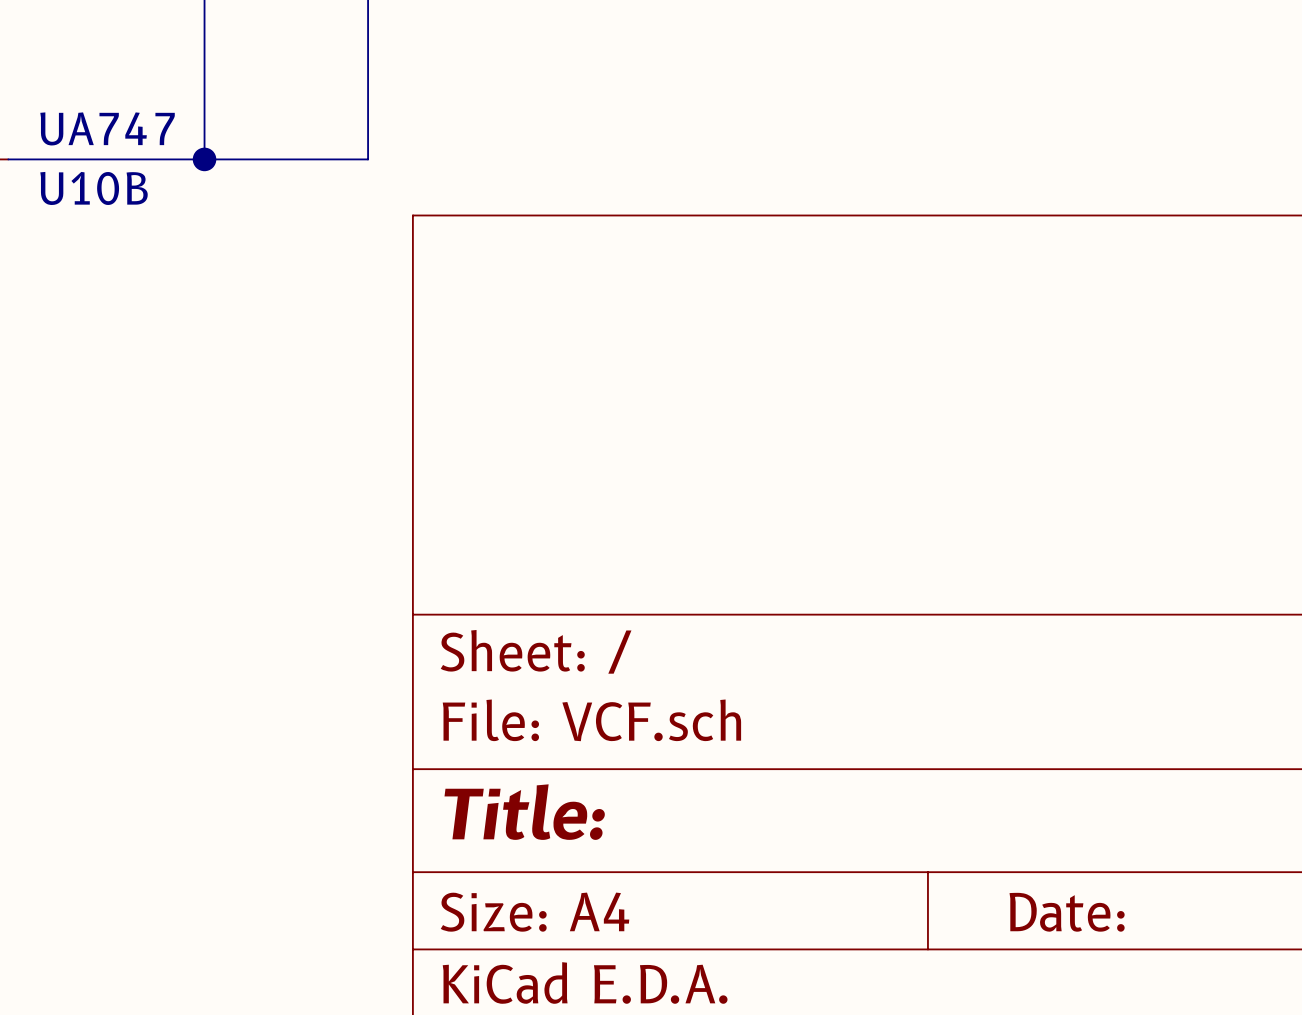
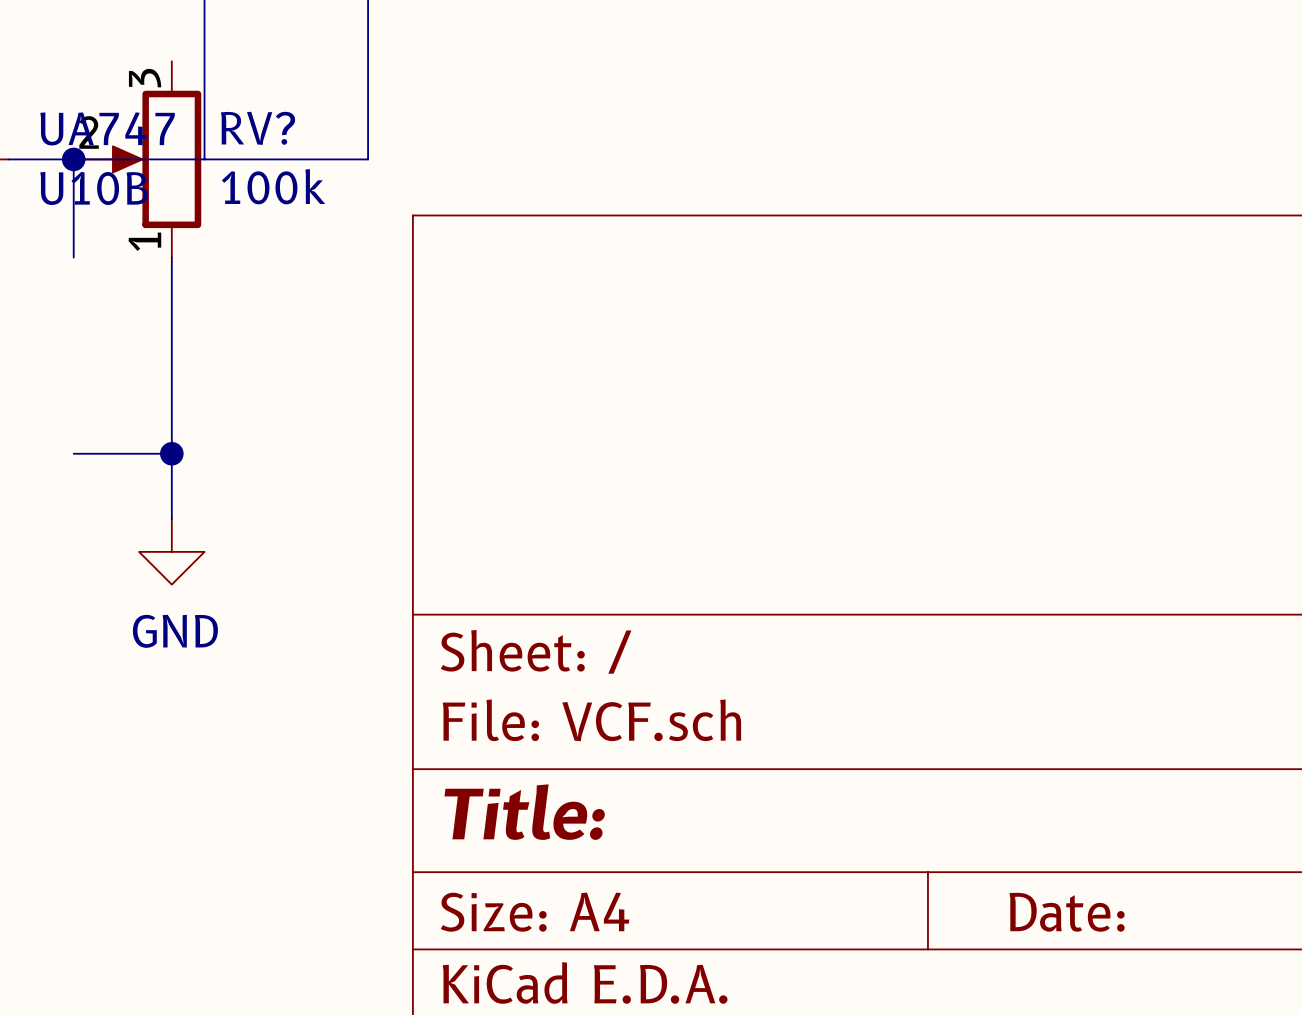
wire: none -> (73, 159) (73, 257)
RV?: none -> 100k (137, 159)
junction position: (204, 159) -> (73, 159)
wire: none -> (171, 257) (171, 519)
wire: none -> (73, 453) (171, 453)
junction: none -> (171, 453)
power symbol: none -> GND (171, 551)

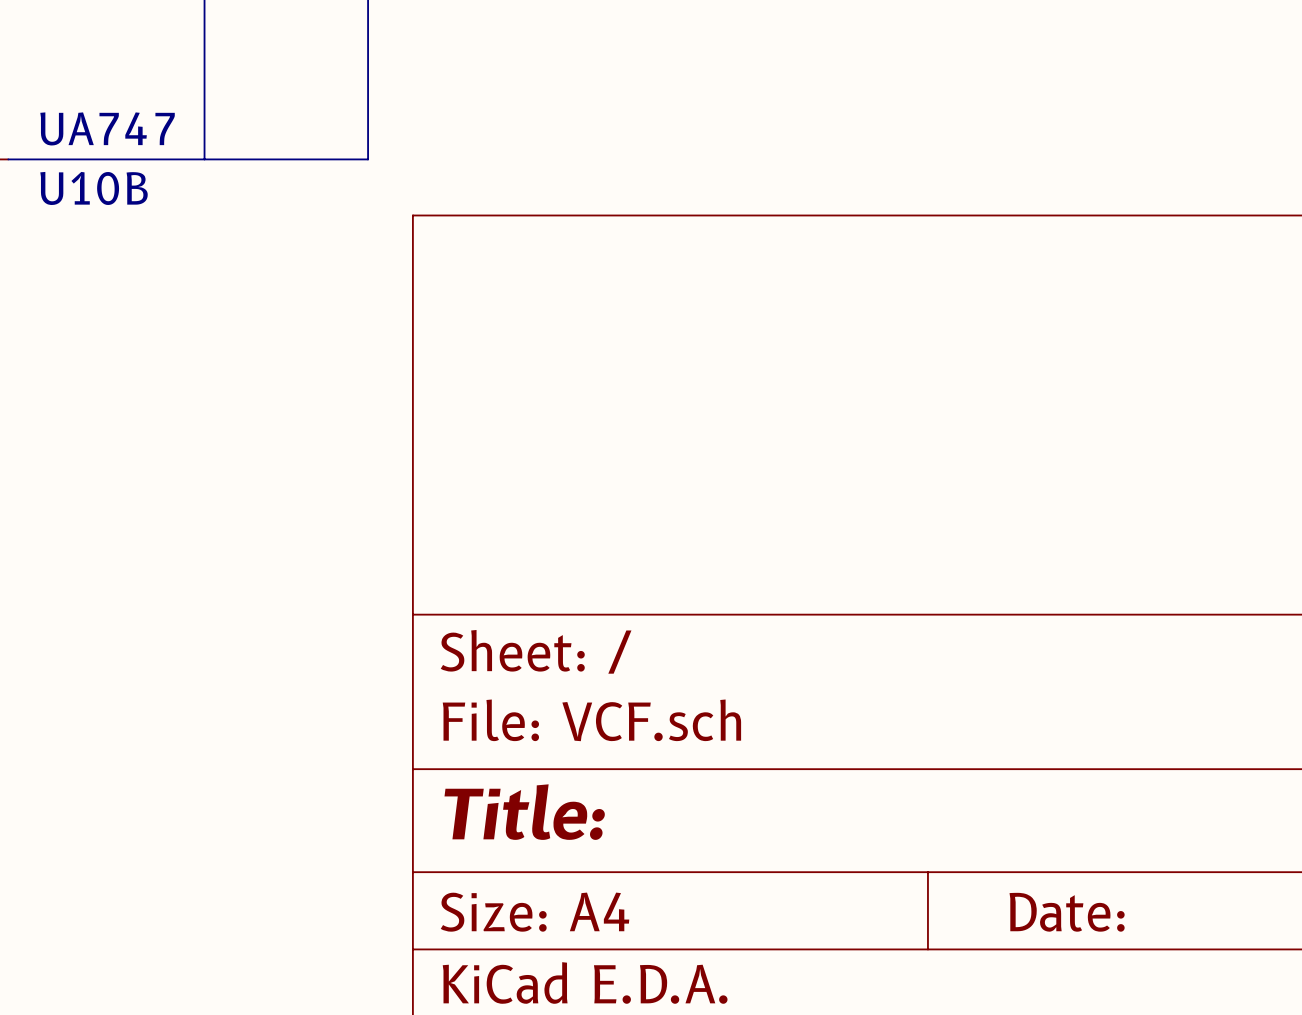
wire: (73, 159) (73, 257) -> none
junction: (73, 159) -> none
RV?: 100k (137, 159) -> none
wire: (171, 257) (171, 519) -> none
wire: (73, 453) (171, 453) -> none
junction: (171, 453) -> none
power symbol: GND (171, 551) -> none

